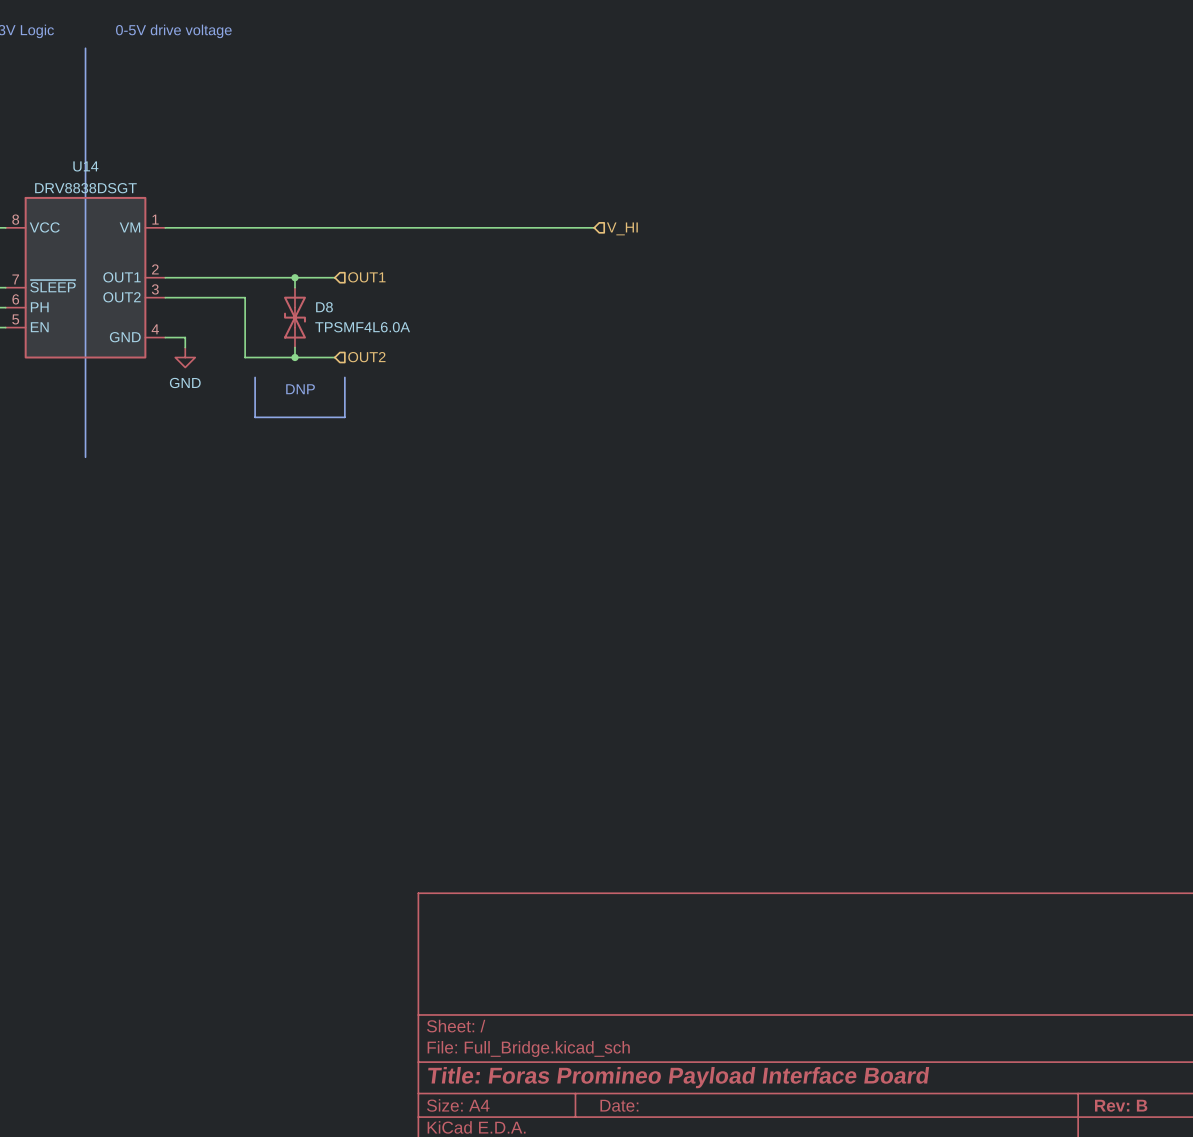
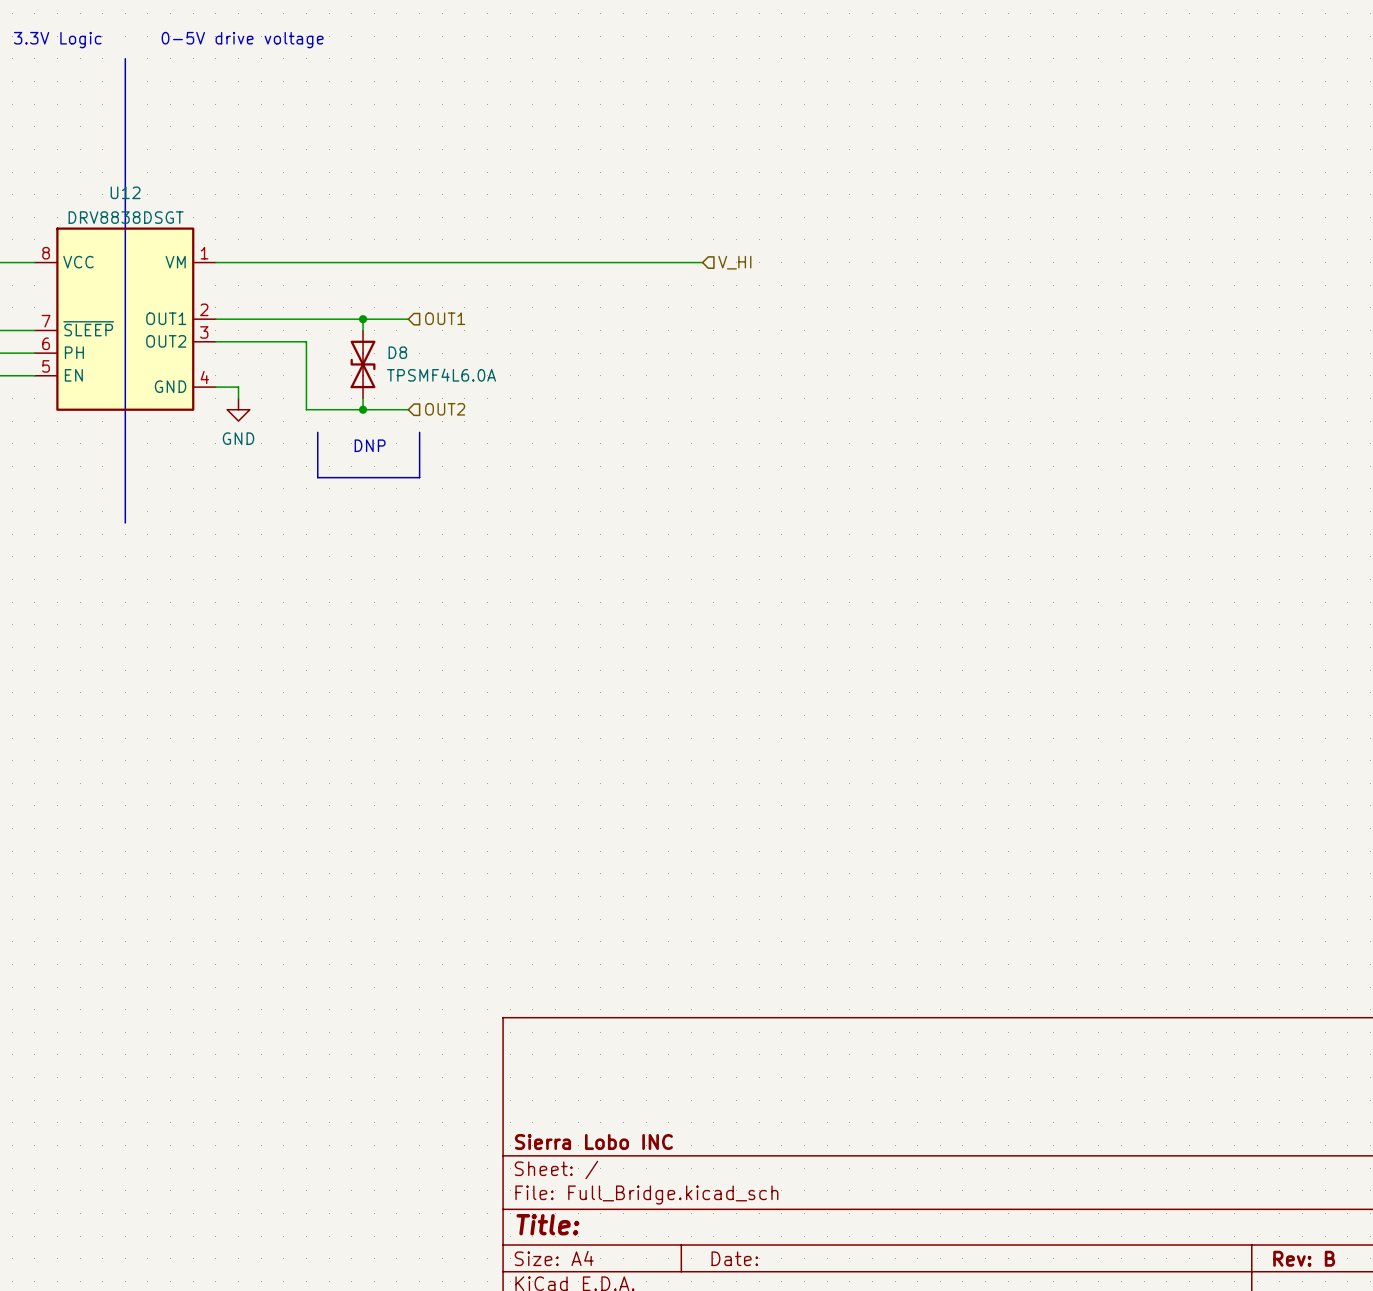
U14 name: U14 (85, 166) -> U12 (125, 192)
title block: none -> Sierra Lobo INC (593, 1141)
title block: Title: Foras Promineo Payload Interface Board (678, 1077) -> Title: (547, 1224)

